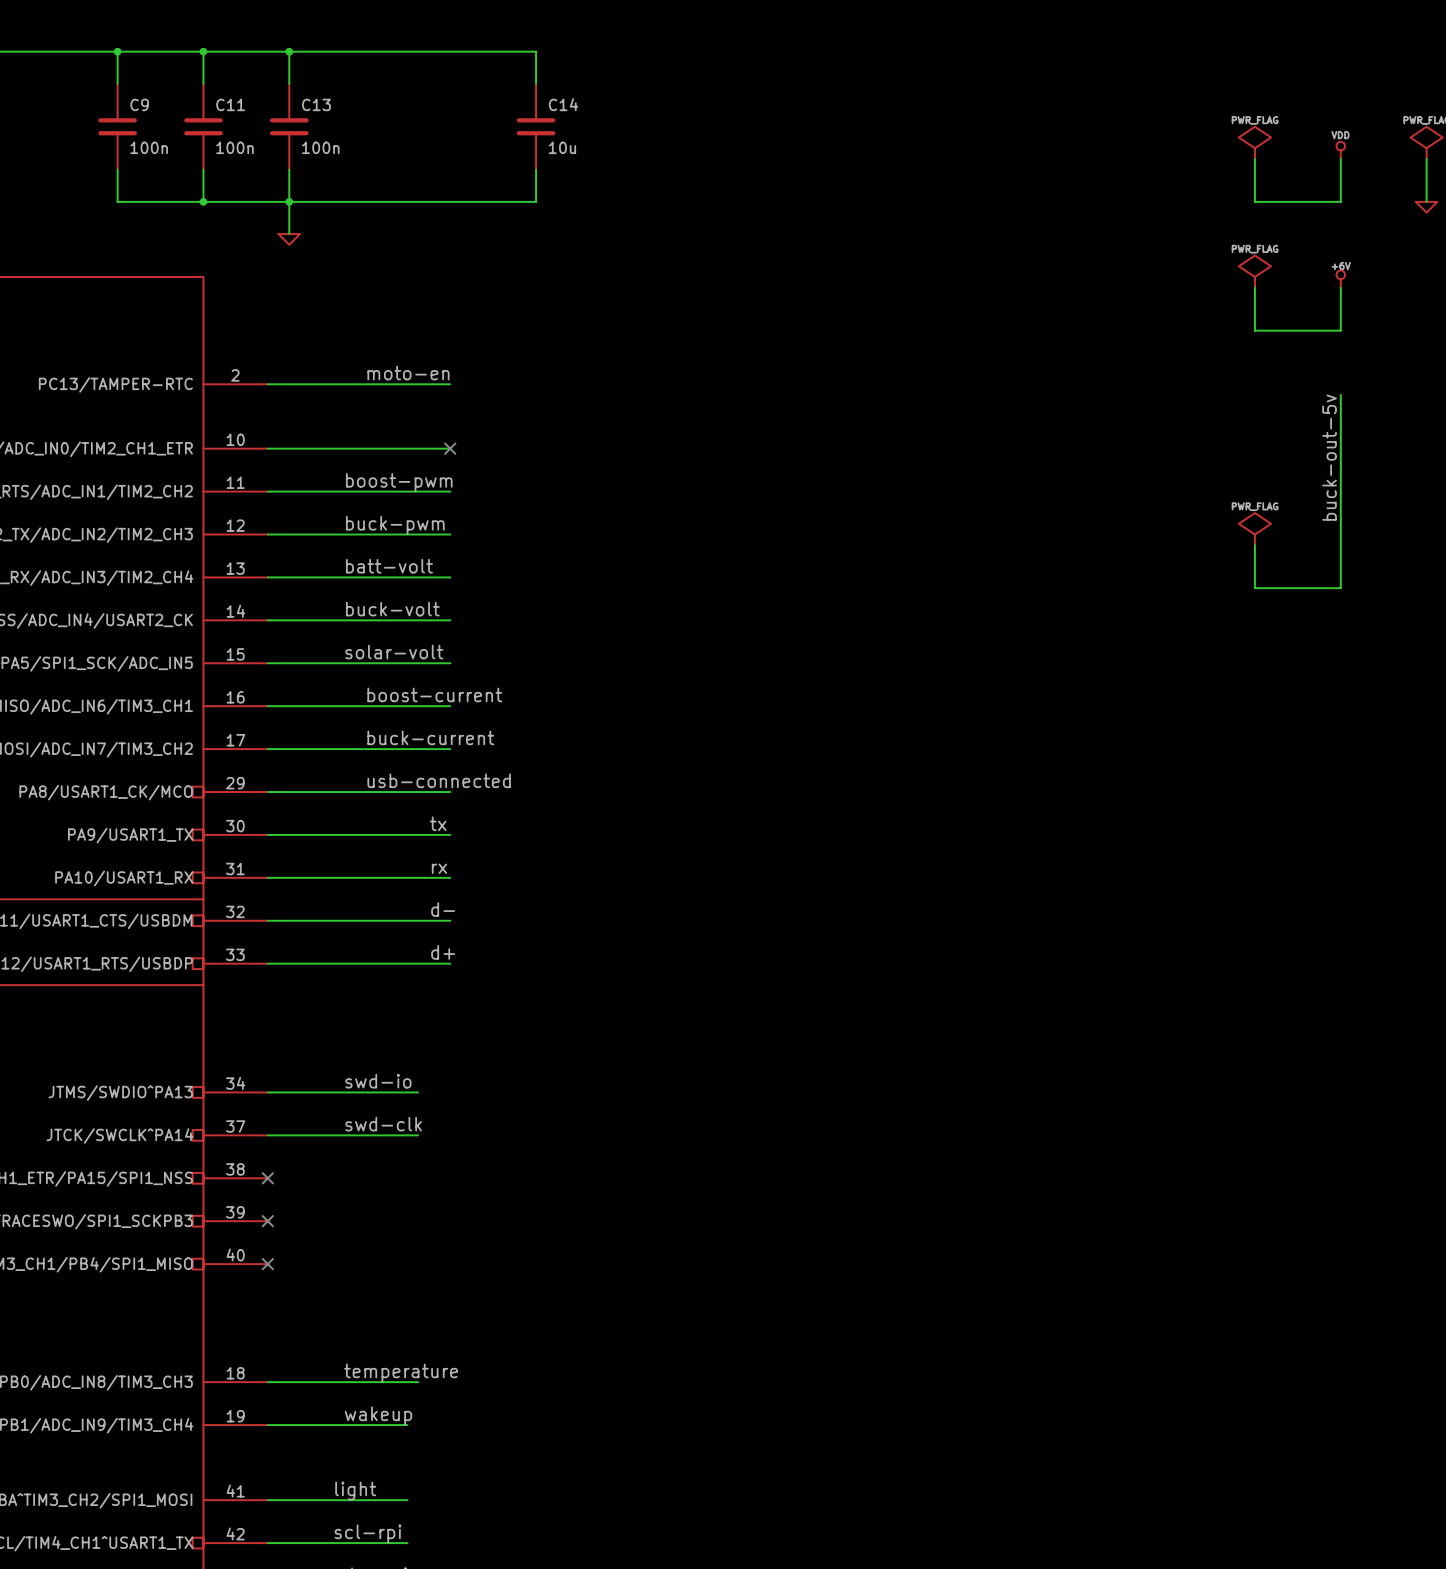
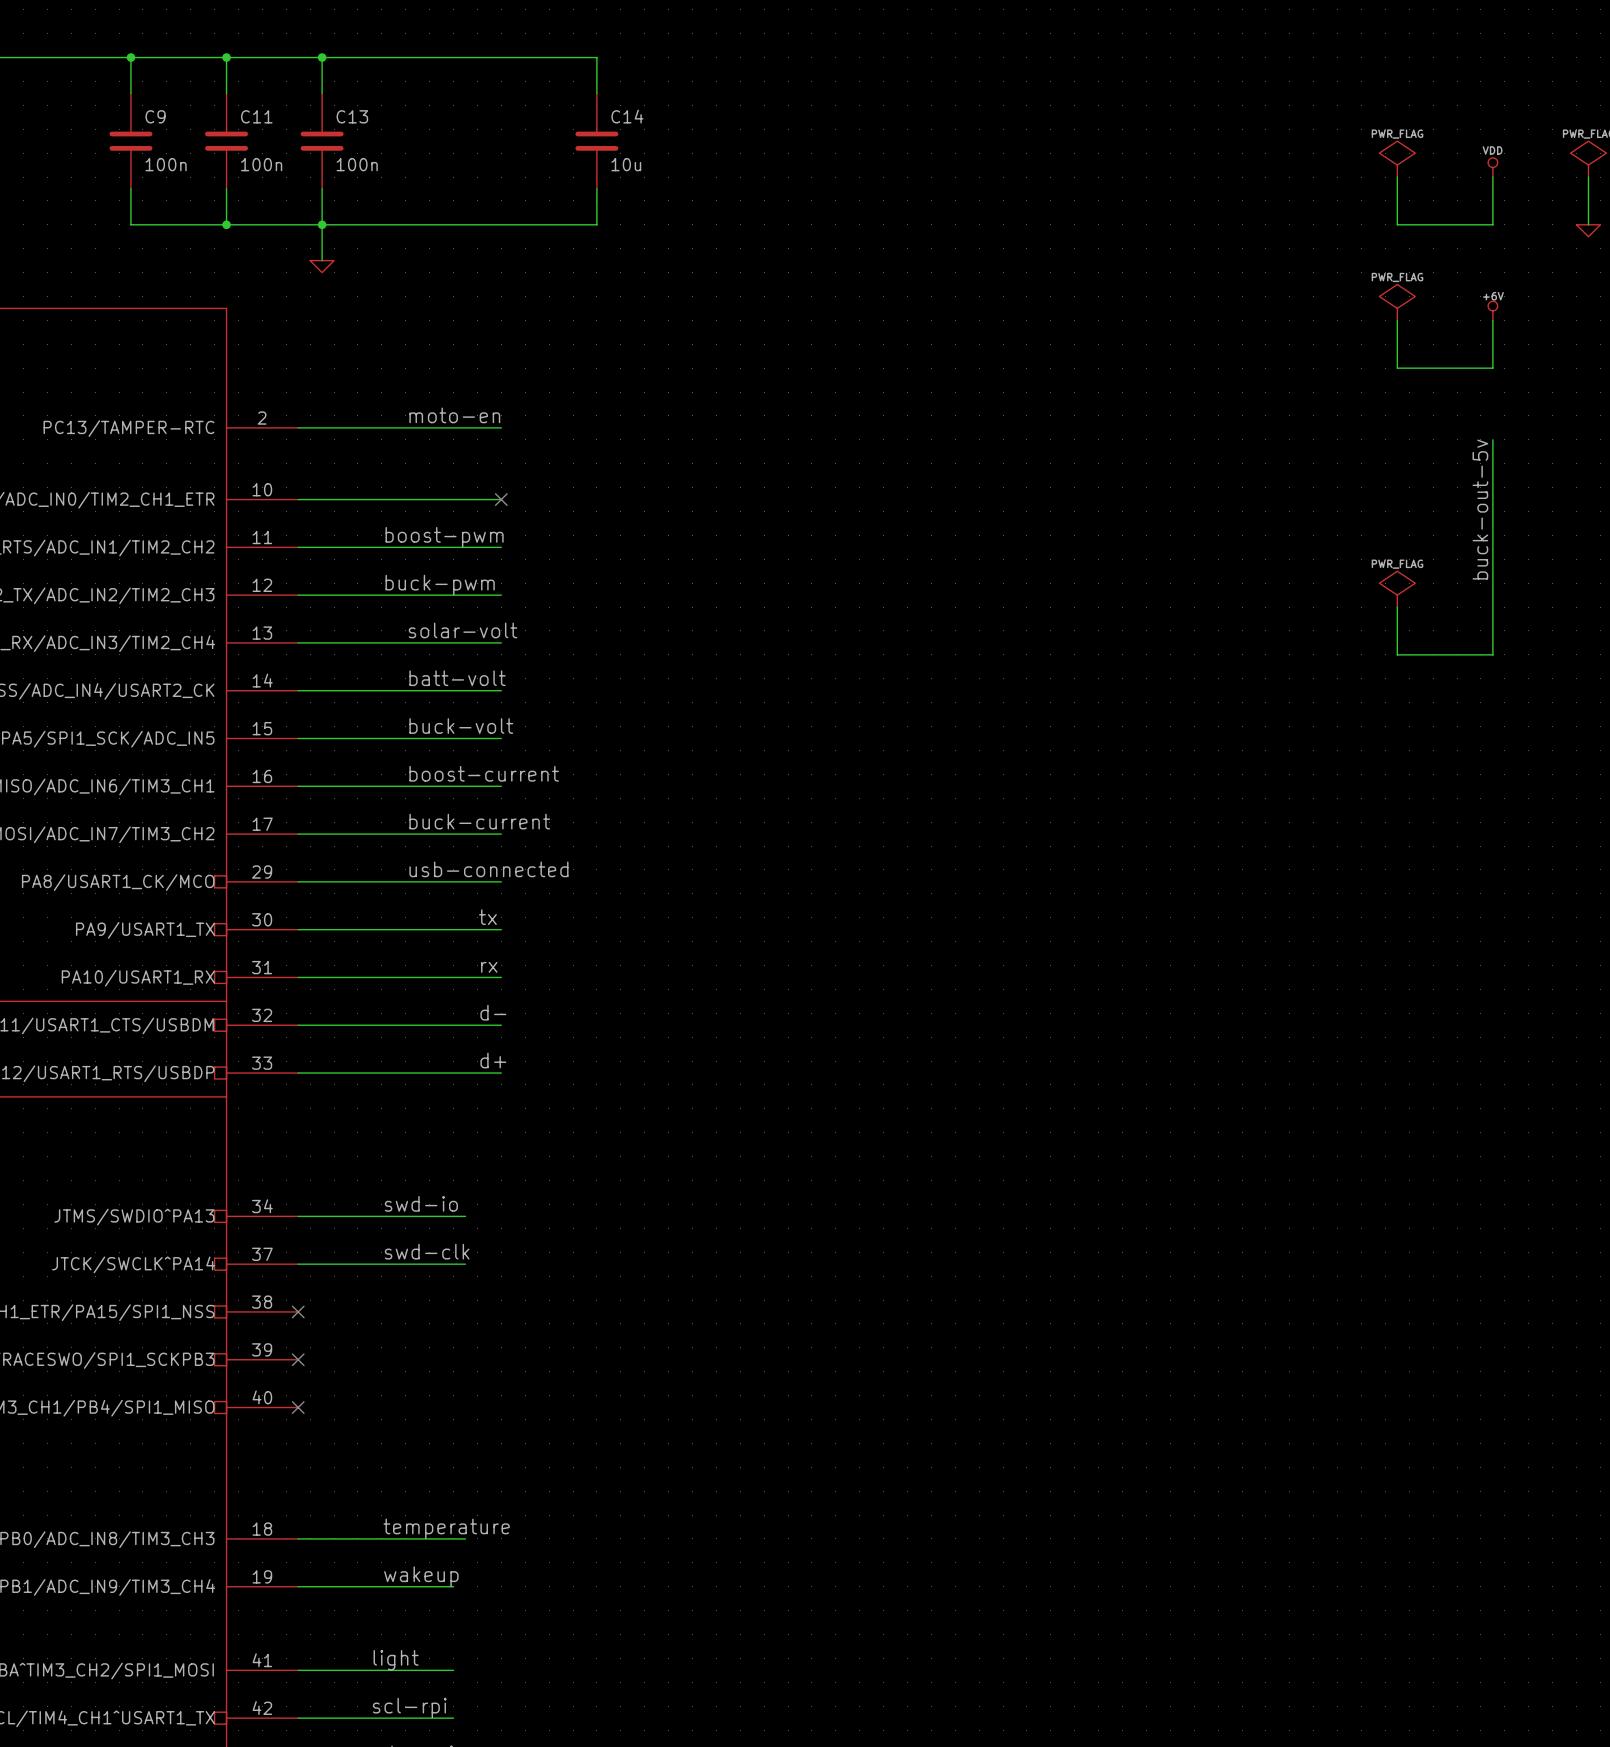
label position: batt-volt (389, 566) -> batt-volt (457, 678)
label position: buck-volt (392, 609) -> buck-volt (461, 726)
label position: solar-volt (394, 652) -> solar-volt (463, 630)

